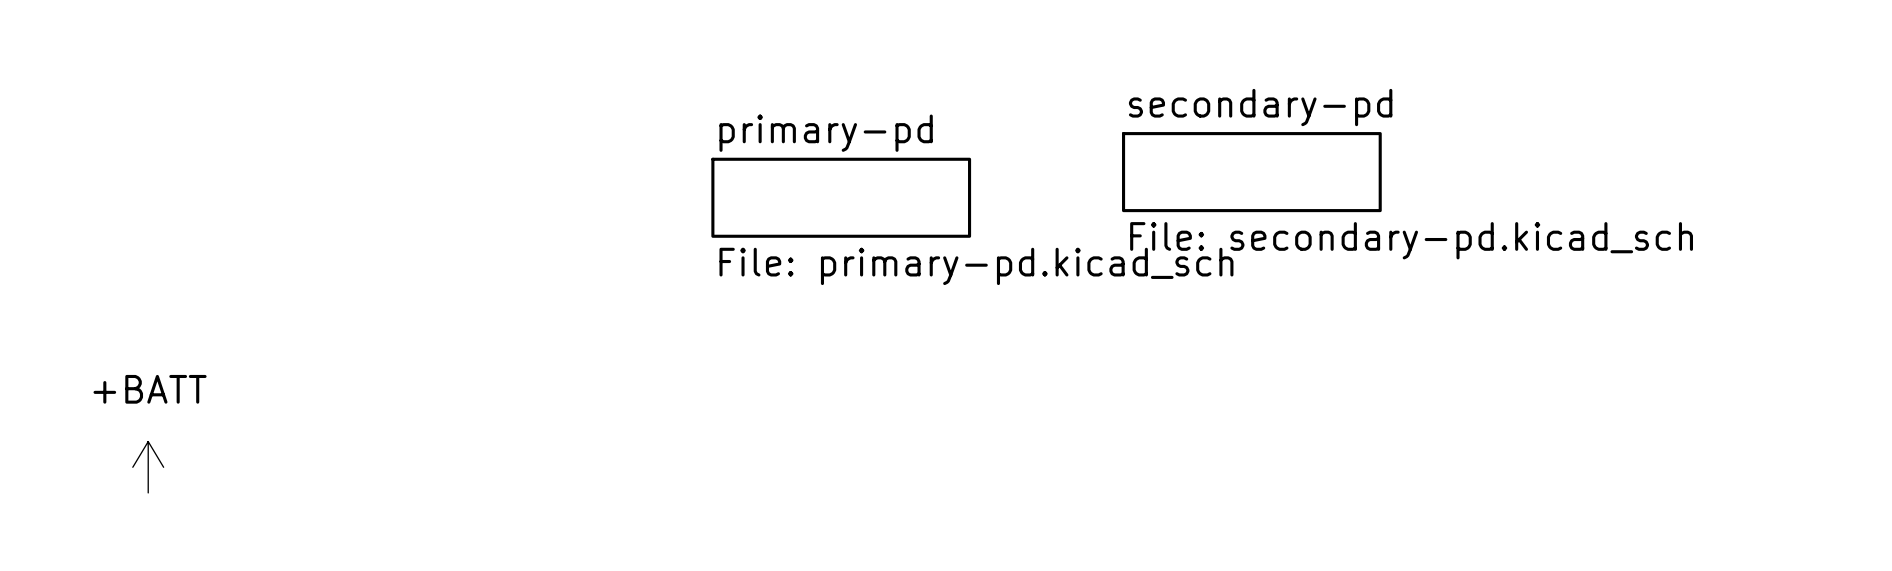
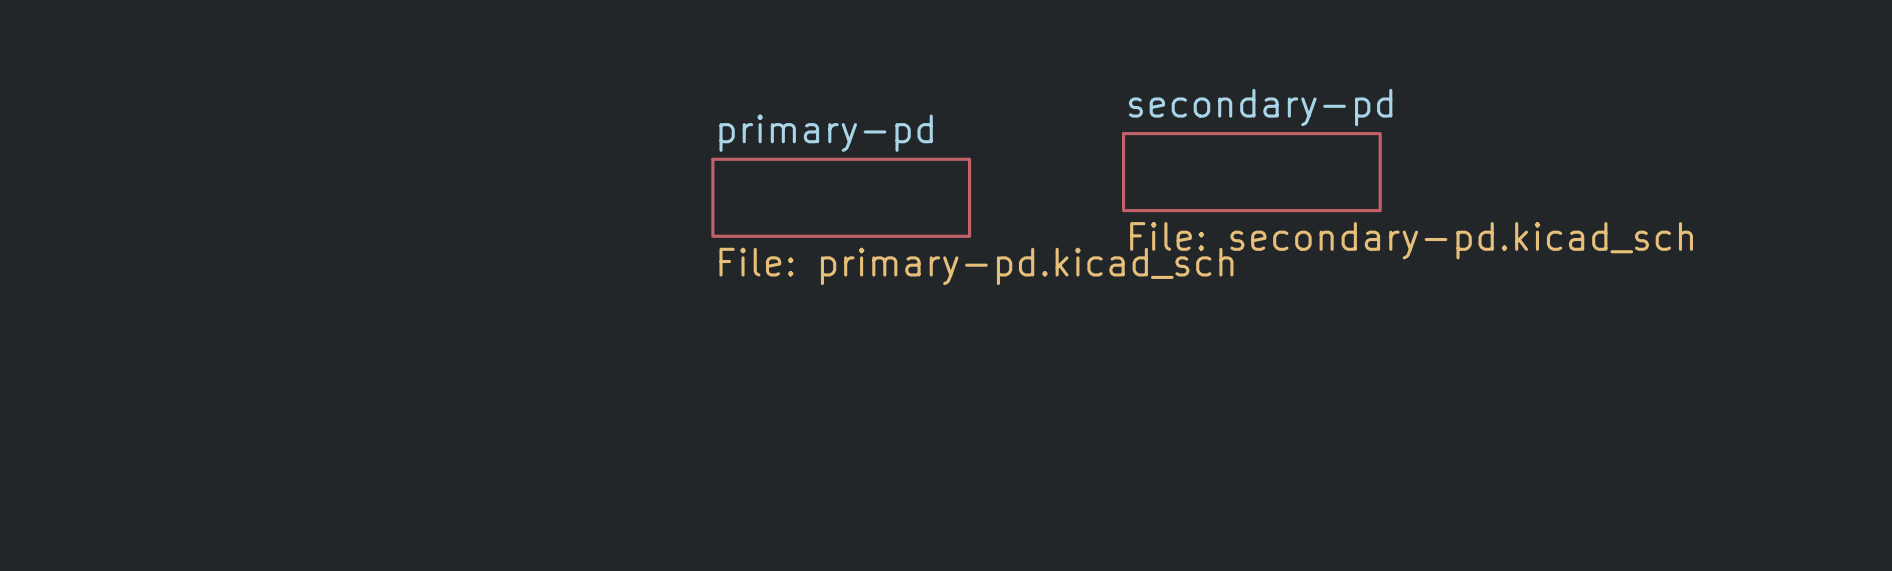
power symbol: +BATT (148, 467) -> none

